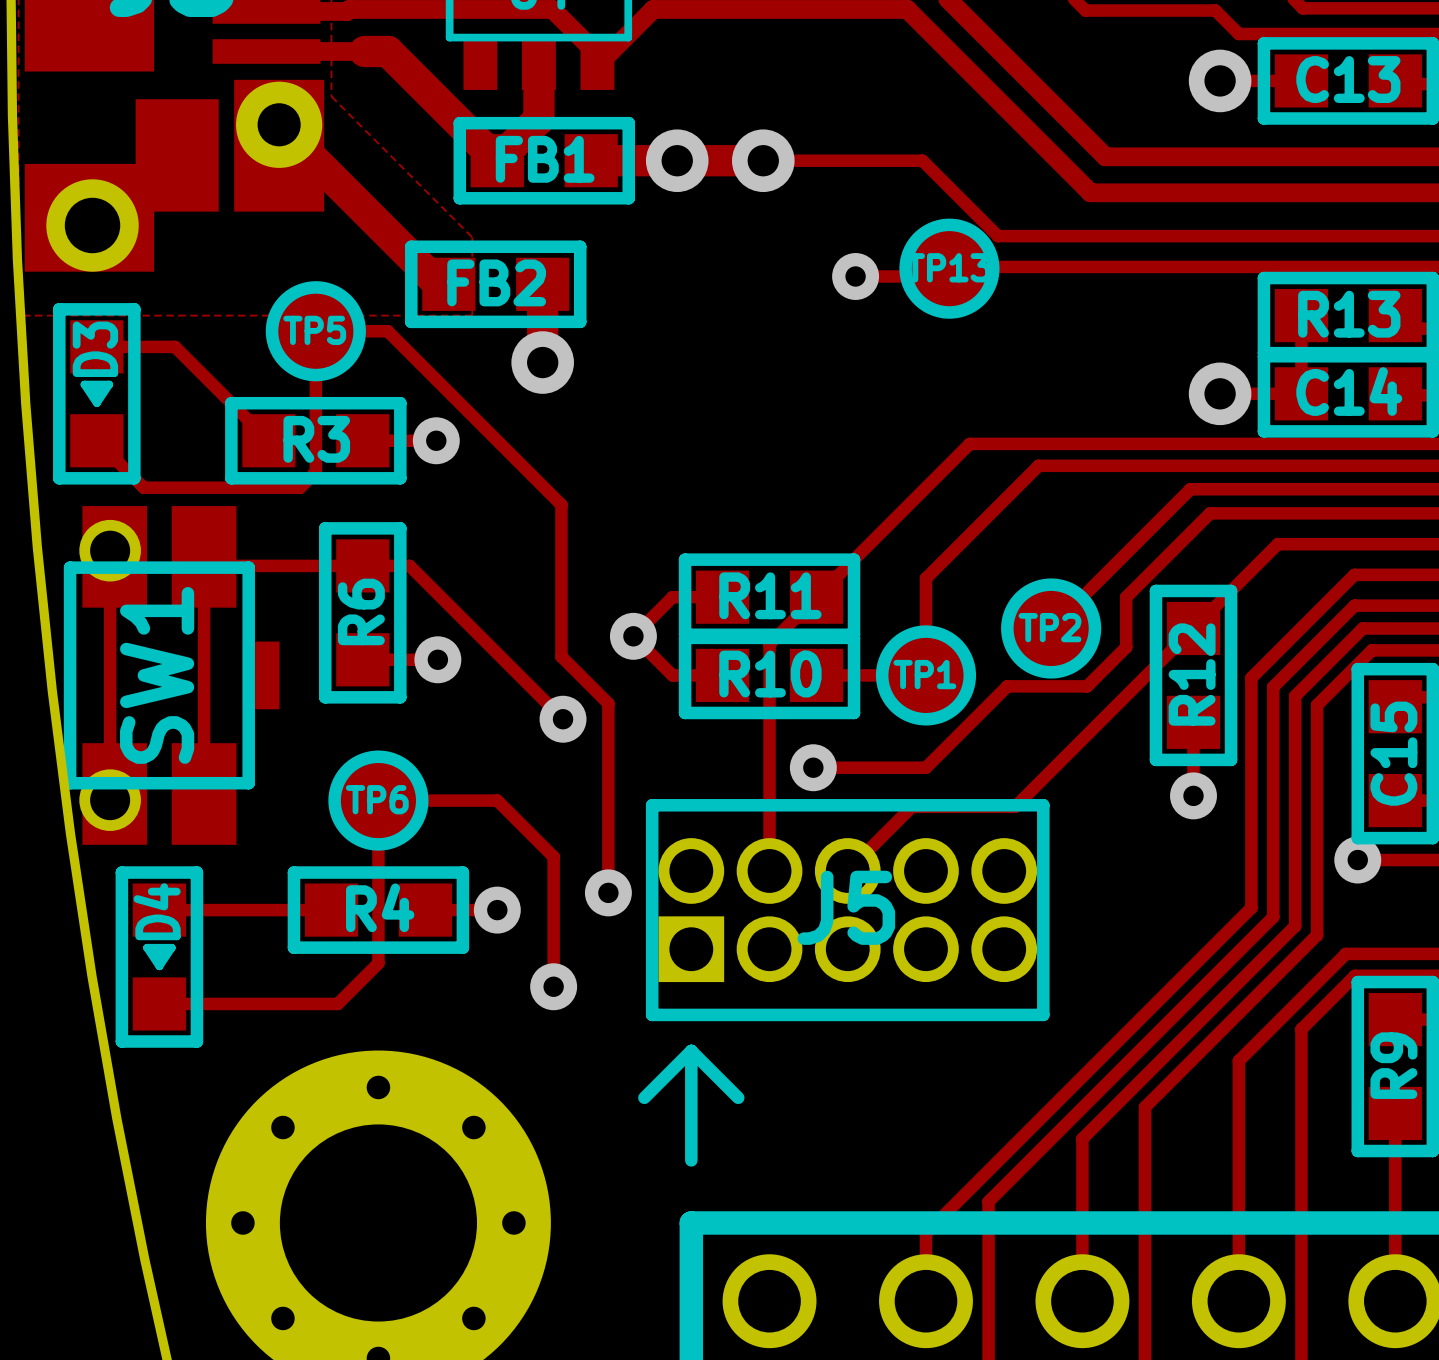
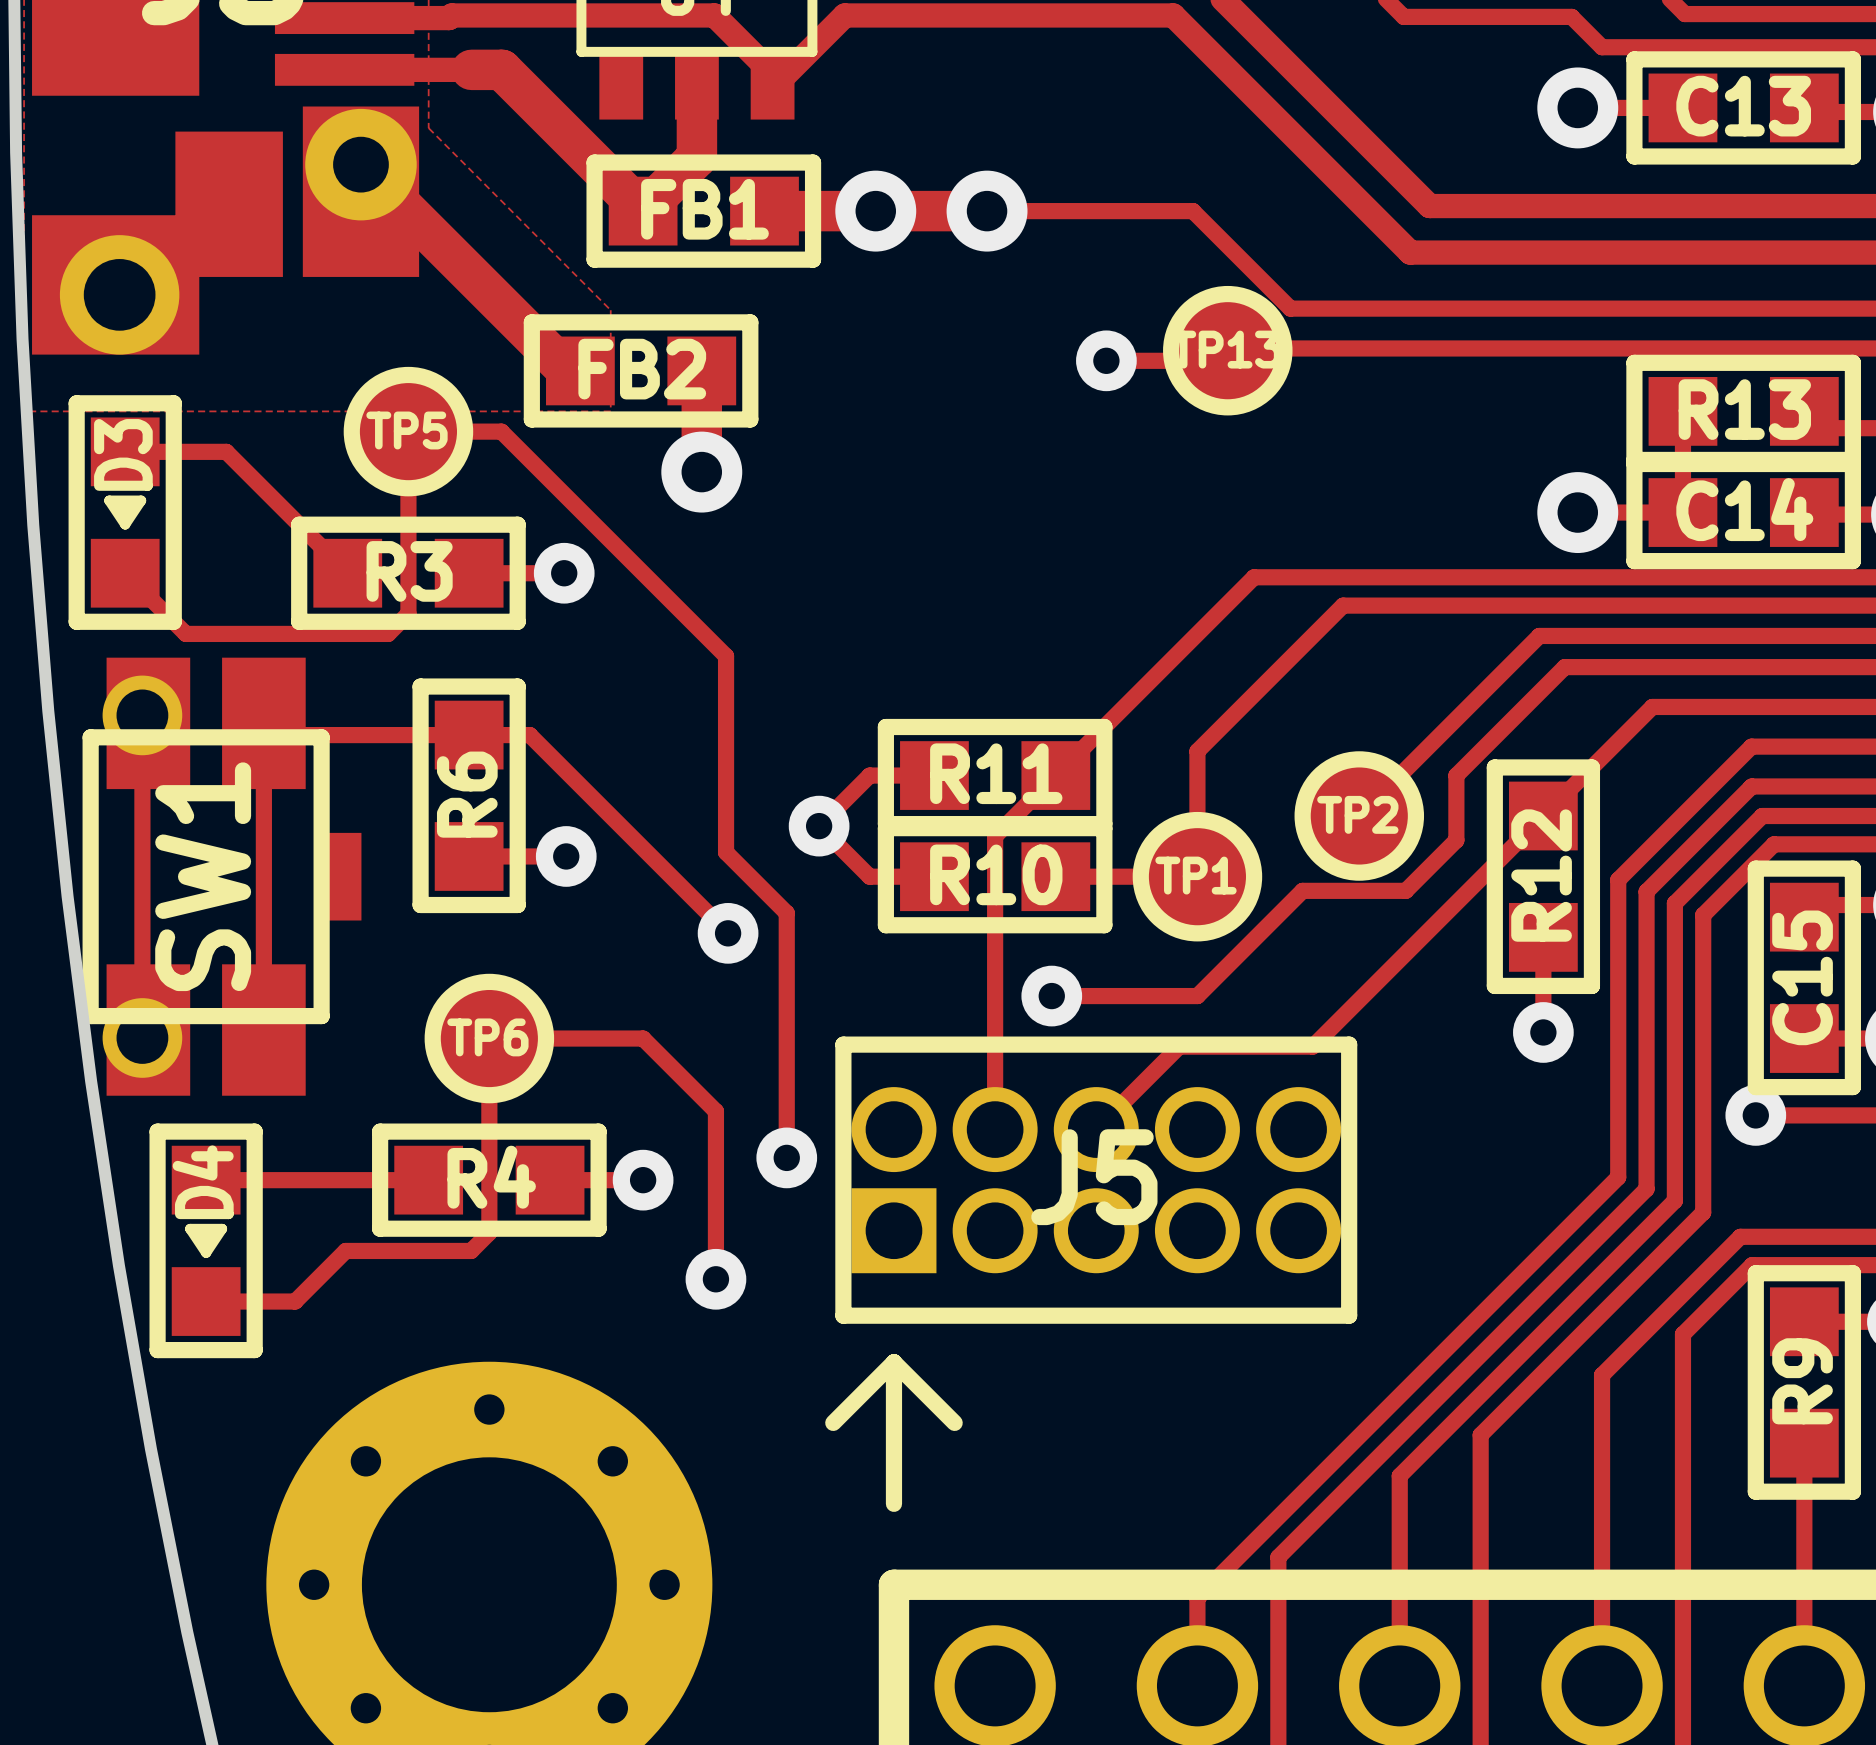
track: (378, 950) (378, 963) (337, 1003) (228, 1003) -> (489, 1232) (471, 1250) (345, 1250) (295, 1301)

